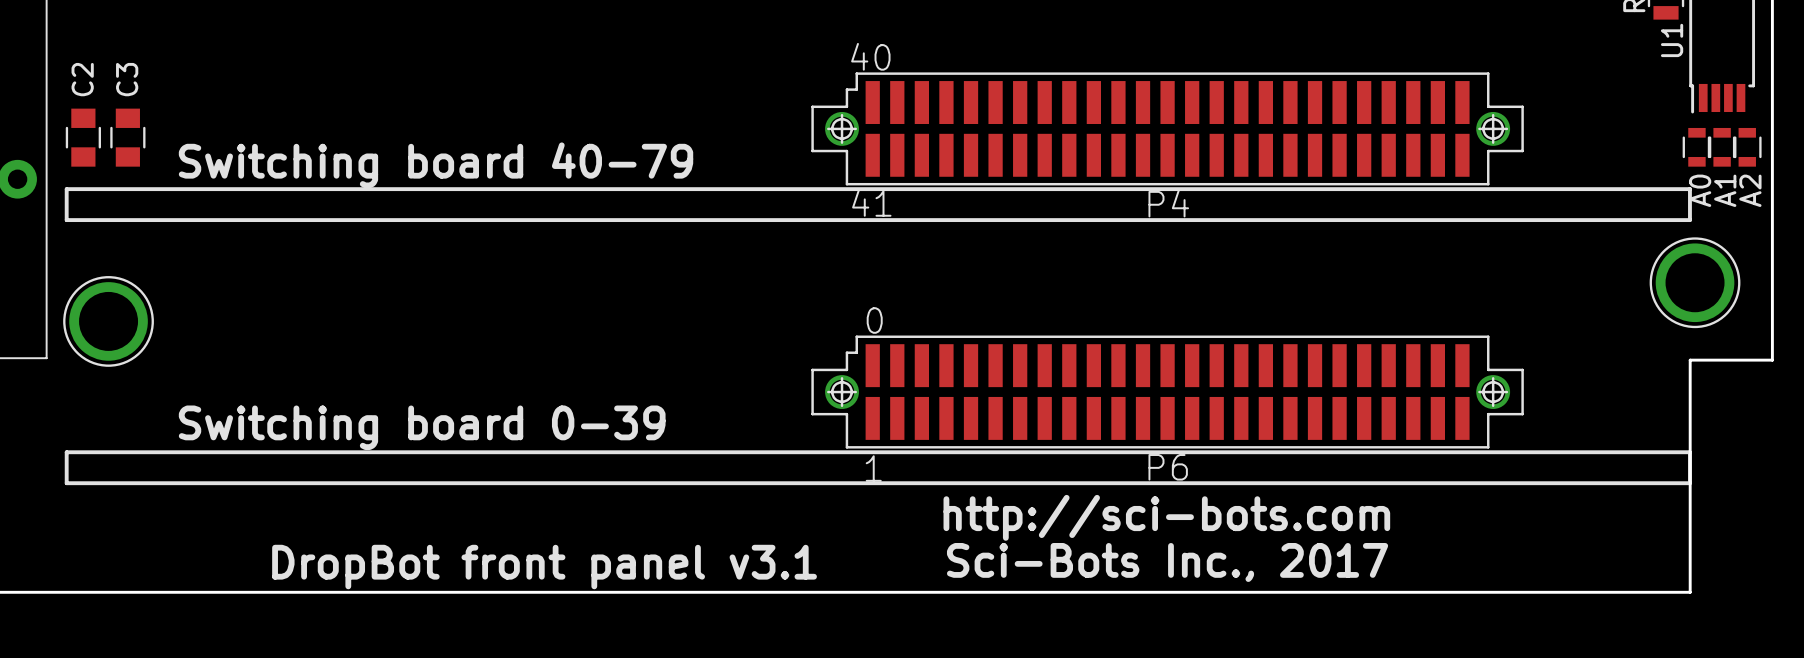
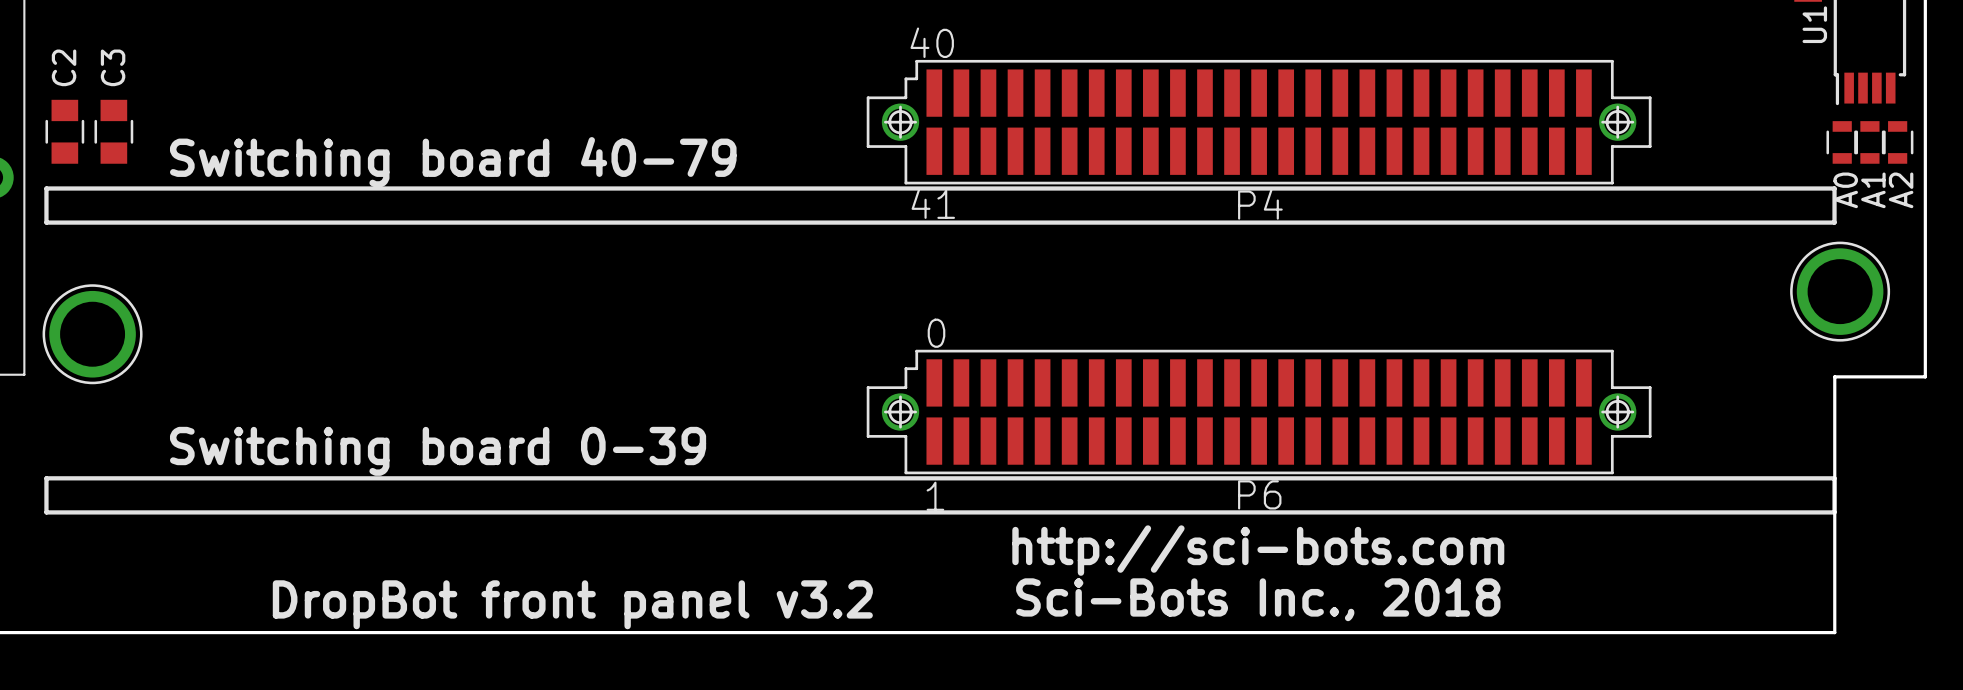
text: Sci-Bots Inc., 2017 (1167, 562) -> Sci-Bots Inc., 2018 (1258, 599)
text: DropBot front panel v3.1 (544, 567) -> DropBot front panel v3.2 (572, 604)

